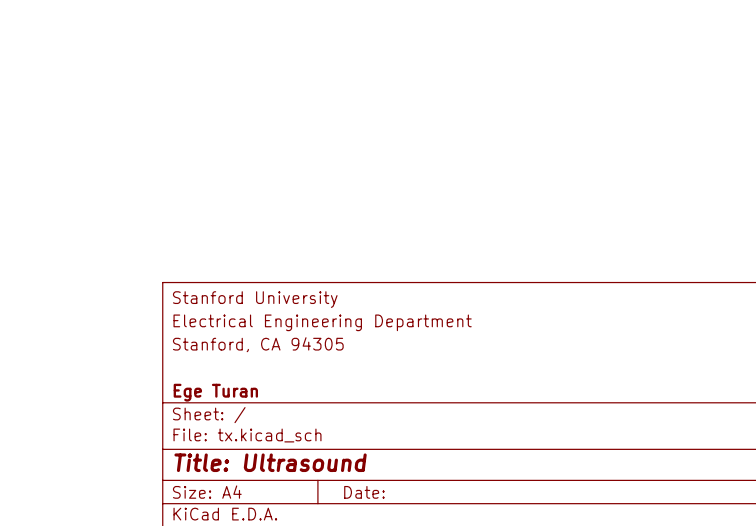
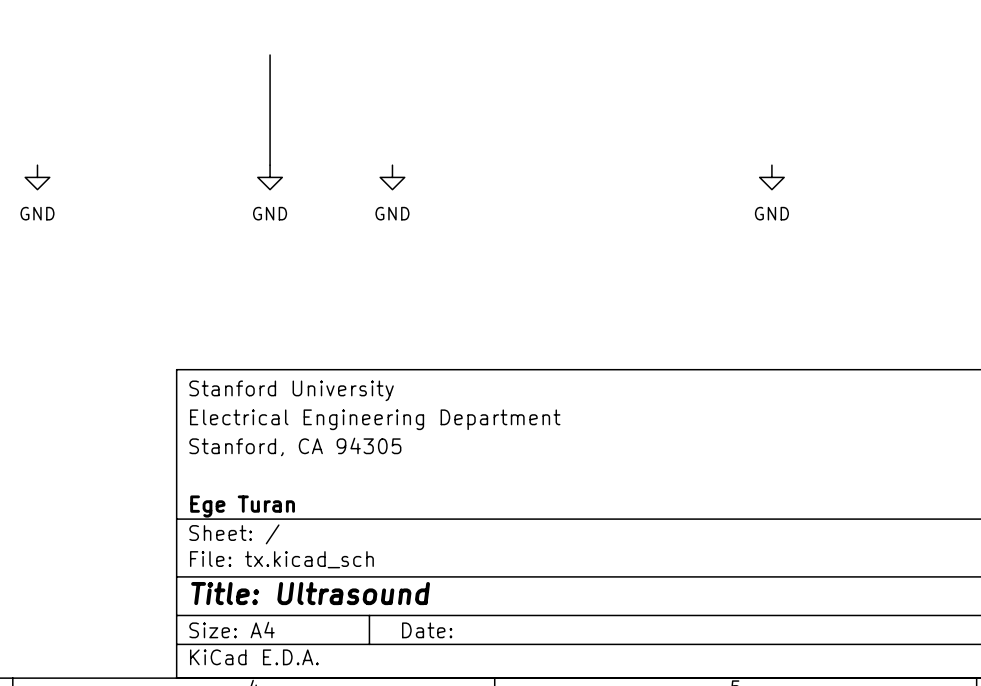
wire: none -> (270, 55) (270, 165)
power symbol: none -> GND (37, 177)
power symbol: none -> GND (270, 177)
power symbol: none -> GND (392, 177)
power symbol: none -> GND (771, 177)

